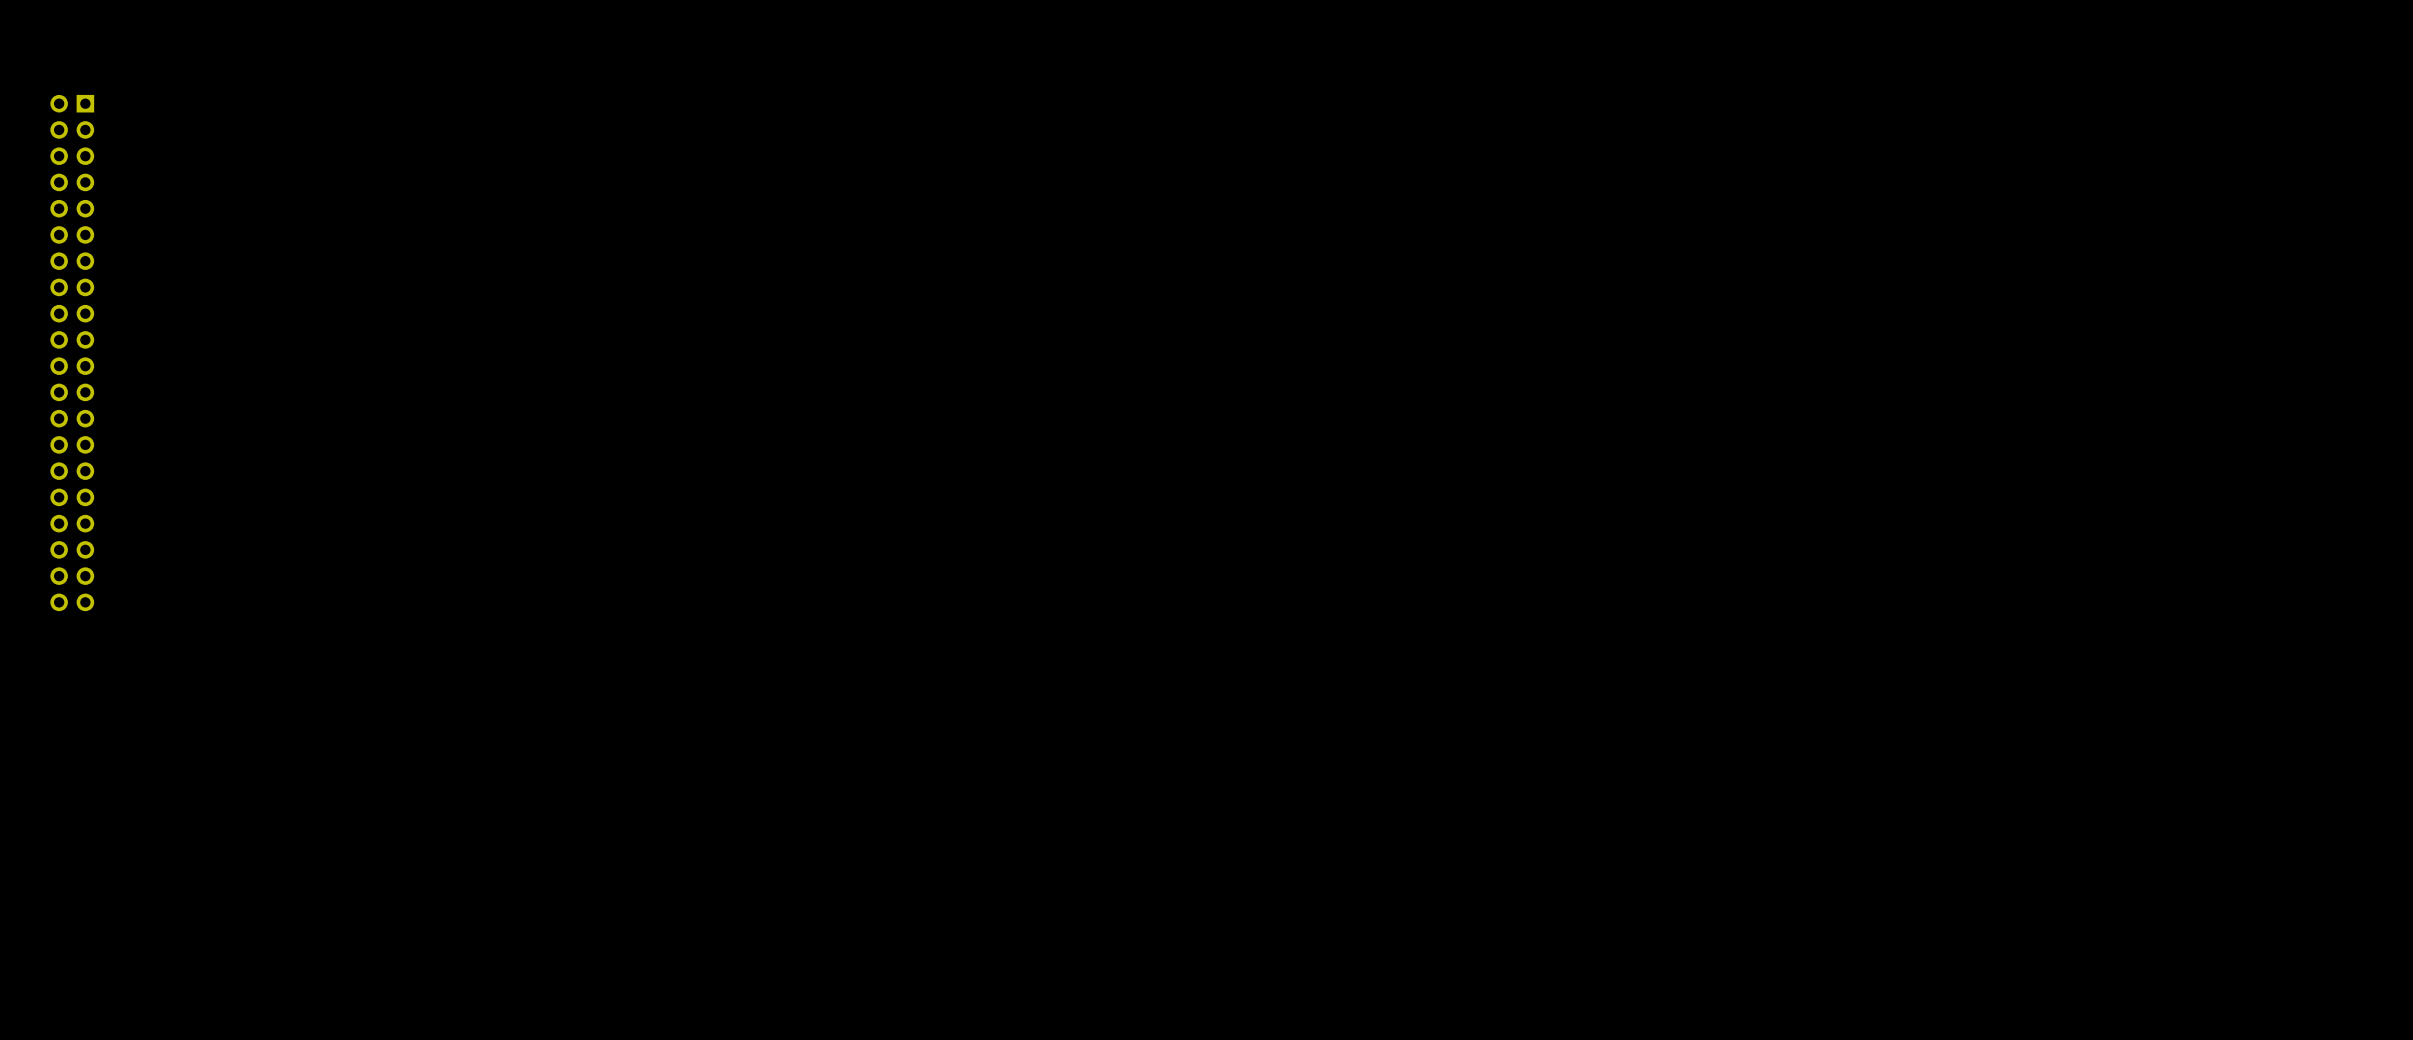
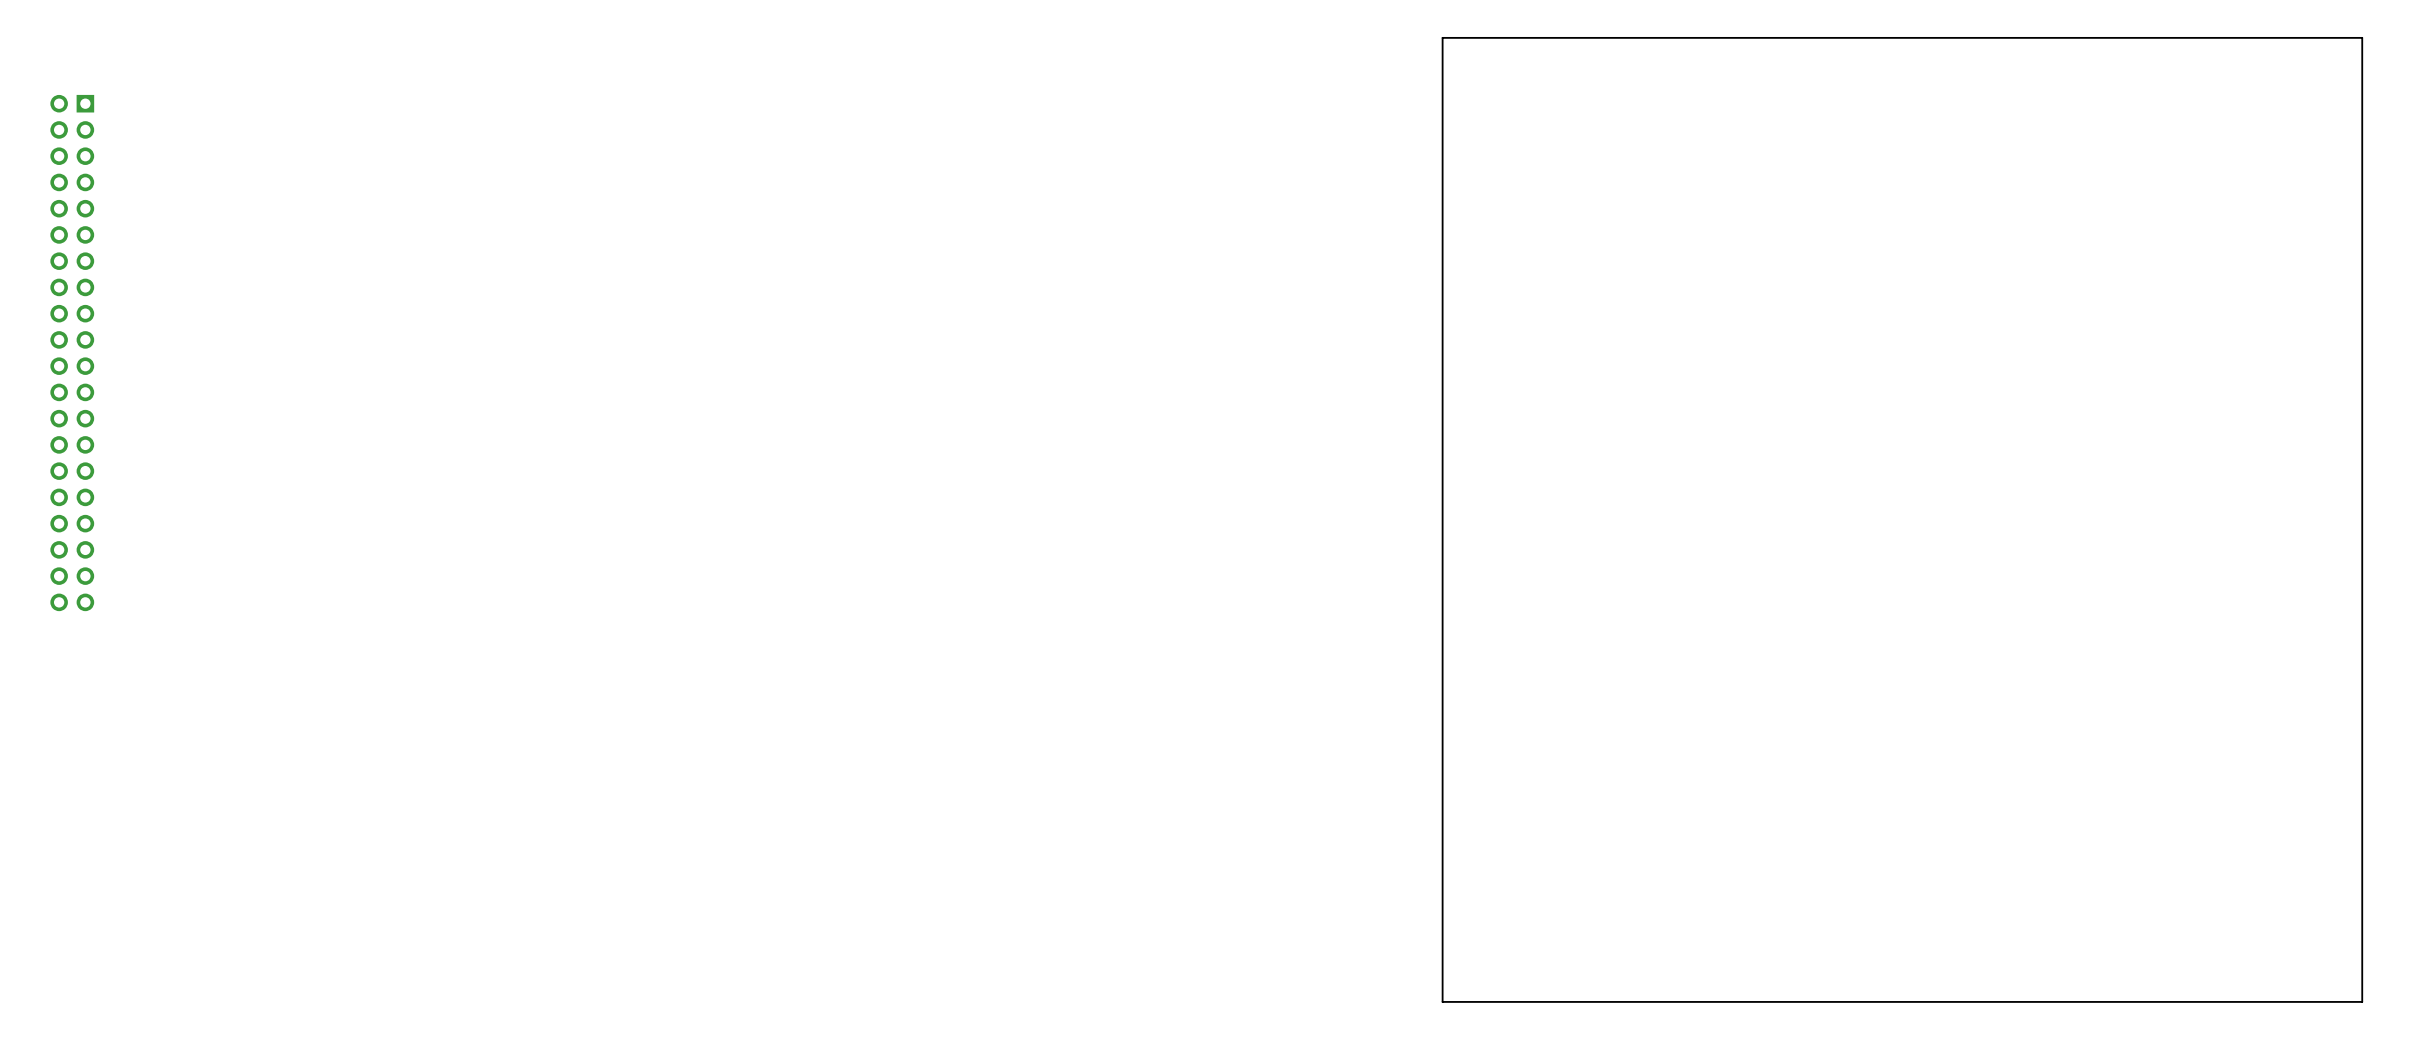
board edge: none -> (2362, 37) (2362, 1001) (1442, 1001) (1442, 37) (2362, 37)

